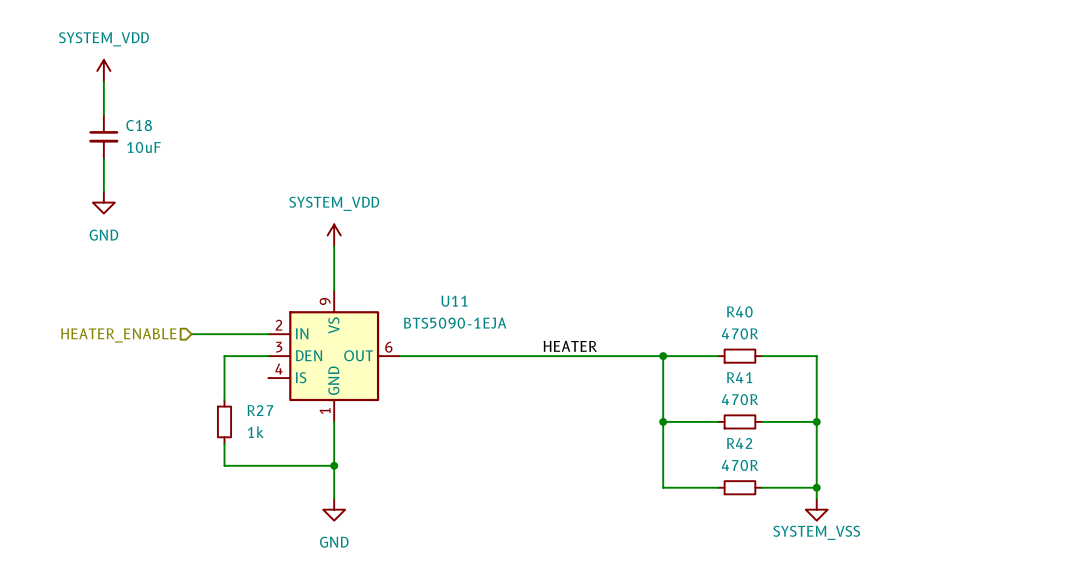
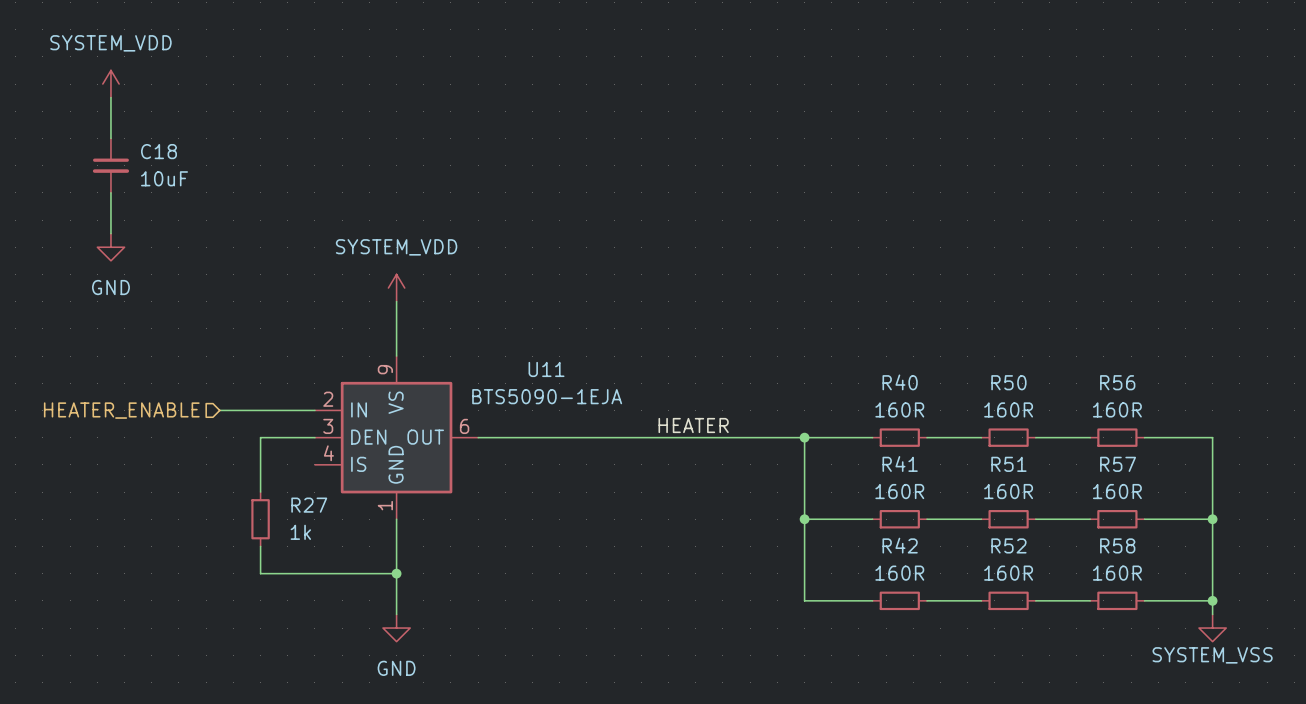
R40 value: 470R (740, 333) -> 160R (899, 409)
wire: (805, 356) (816, 356) (816, 498) -> none
R50: none -> 160R (1008, 437)
wire: none -> (1035, 437) (1090, 437)
R56: none -> 160R (1117, 437)
wire: none -> (1144, 437) (1212, 437) (1212, 614)
R41 value: 470R (740, 399) -> 160R (899, 491)
junction: (816, 421) -> none
R51: none -> 160R (1008, 519)
wire: none -> (1035, 519) (1090, 519)
R57: none -> 160R (1117, 519)
wire: none -> (1144, 519) (1212, 519)
junction: none -> (1212, 519)
R42 value: 470R (740, 465) -> 160R (899, 573)
junction: (816, 487) -> none
R52: none -> 160R (1008, 600)
wire: none -> (1035, 600) (1090, 600)
R58: none -> 160R (1117, 600)
wire: none -> (1144, 600) (1212, 600)
junction: none -> (1212, 600)
power symbol position: SYSTEM_VSS (816, 509) -> SYSTEM_VSS (1212, 628)

